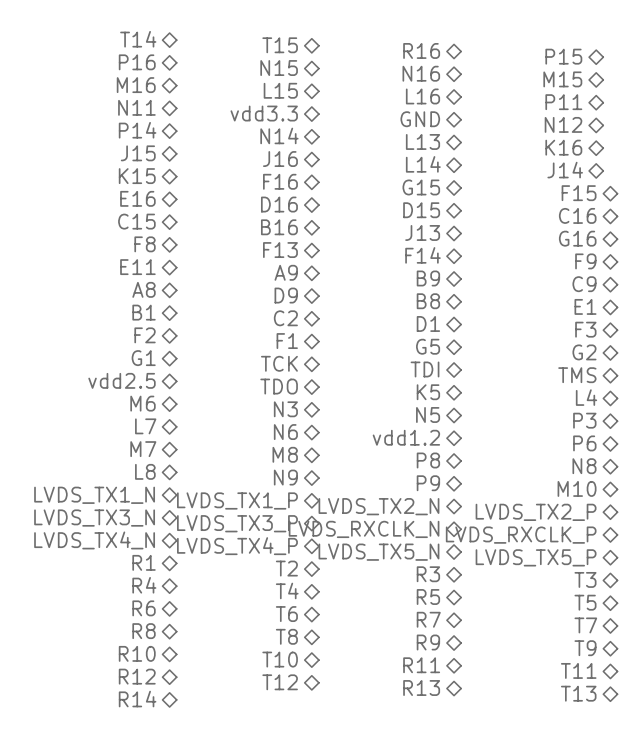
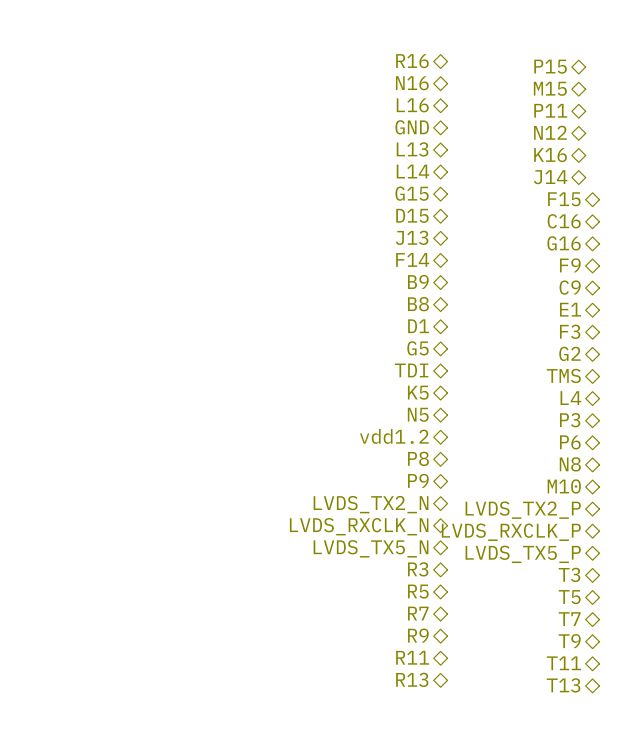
hierarchical label: T14 (138, 39) -> none
hierarchical label: T15 (280, 45) -> none
hierarchical label: P16 (137, 62) -> none
hierarchical label: N15 (279, 68) -> none
hierarchical label: M16 (136, 85) -> none
hierarchical label: L15 (280, 90) -> none
hierarchical label: N11 (136, 107) -> none
hierarchical label: vdd3.3 (264, 113) -> none
hierarchical label: P14 (137, 130) -> none
hierarchical label: N14 (279, 135) -> none
hierarchical label: J15 (138, 153) -> none
hierarchical label: J16 (280, 159) -> none
hierarchical label: K15 (137, 176) -> none
hierarchical label: F16 (280, 181) -> none
hierarchical label: E16 (137, 198) -> none
hierarchical label: D16 (279, 204) -> none
hierarchical label: C15 (136, 221) -> none
hierarchical label: B16 (279, 227) -> none
hierarchical label: F8 (145, 244) -> none
hierarchical label: F13 (280, 250) -> none
hierarchical label: E11 (137, 267) -> none
hierarchical label: A9 (286, 272) -> none
hierarchical label: A8 (144, 289) -> none
hierarchical label: D9 (286, 295) -> none
hierarchical label: B1 (144, 312) -> none
hierarchical label: C2 (285, 318) -> none
hierarchical label: F2 (145, 335) -> none
hierarchical label: F1 (287, 341) -> none
hierarchical label: G1 (143, 358) -> none
hierarchical label: TCK (279, 363) -> none
hierarchical label: vdd2.5 (122, 380) -> none
hierarchical label: TDO (279, 386) -> none
hierarchical label: M6 (143, 403) -> none
hierarchical label: N3 (285, 409) -> none
hierarchical label: L7 (145, 426) -> none
hierarchical label: N6 (285, 432) -> none
hierarchical label: M7 (143, 449) -> none
hierarchical label: M8 (285, 454) -> none
hierarchical label: L8 (145, 471) -> none
hierarchical label: N9 (285, 477) -> none
hierarchical label: LVDS_TX1_N (94, 495) -> none
hierarchical label: LVDS_TX1_P (237, 500) -> none
hierarchical label: LVDS_TX3_N (94, 518) -> none
hierarchical label: LVDS_TX3_P (237, 523) -> none
hierarchical label: LVDS_TX4_N (94, 540) -> none
hierarchical label: LVDS_TX4_P (237, 546) -> none
hierarchical label: R1 (144, 562) -> none
hierarchical label: T2 (286, 568) -> none
hierarchical label: R4 (144, 585) -> none
hierarchical label: T4 (287, 590) -> none
hierarchical label: R6 (144, 608) -> none
hierarchical label: T6 (286, 614) -> none
hierarchical label: R8 (144, 631) -> none
hierarchical label: T8 (286, 636) -> none
hierarchical label: R10 (137, 653) -> none
hierarchical label: T10 (280, 659) -> none
hierarchical label: R12 (137, 676) -> none
hierarchical label: T12 (280, 682) -> none
hierarchical label: R14 (137, 699) -> none

